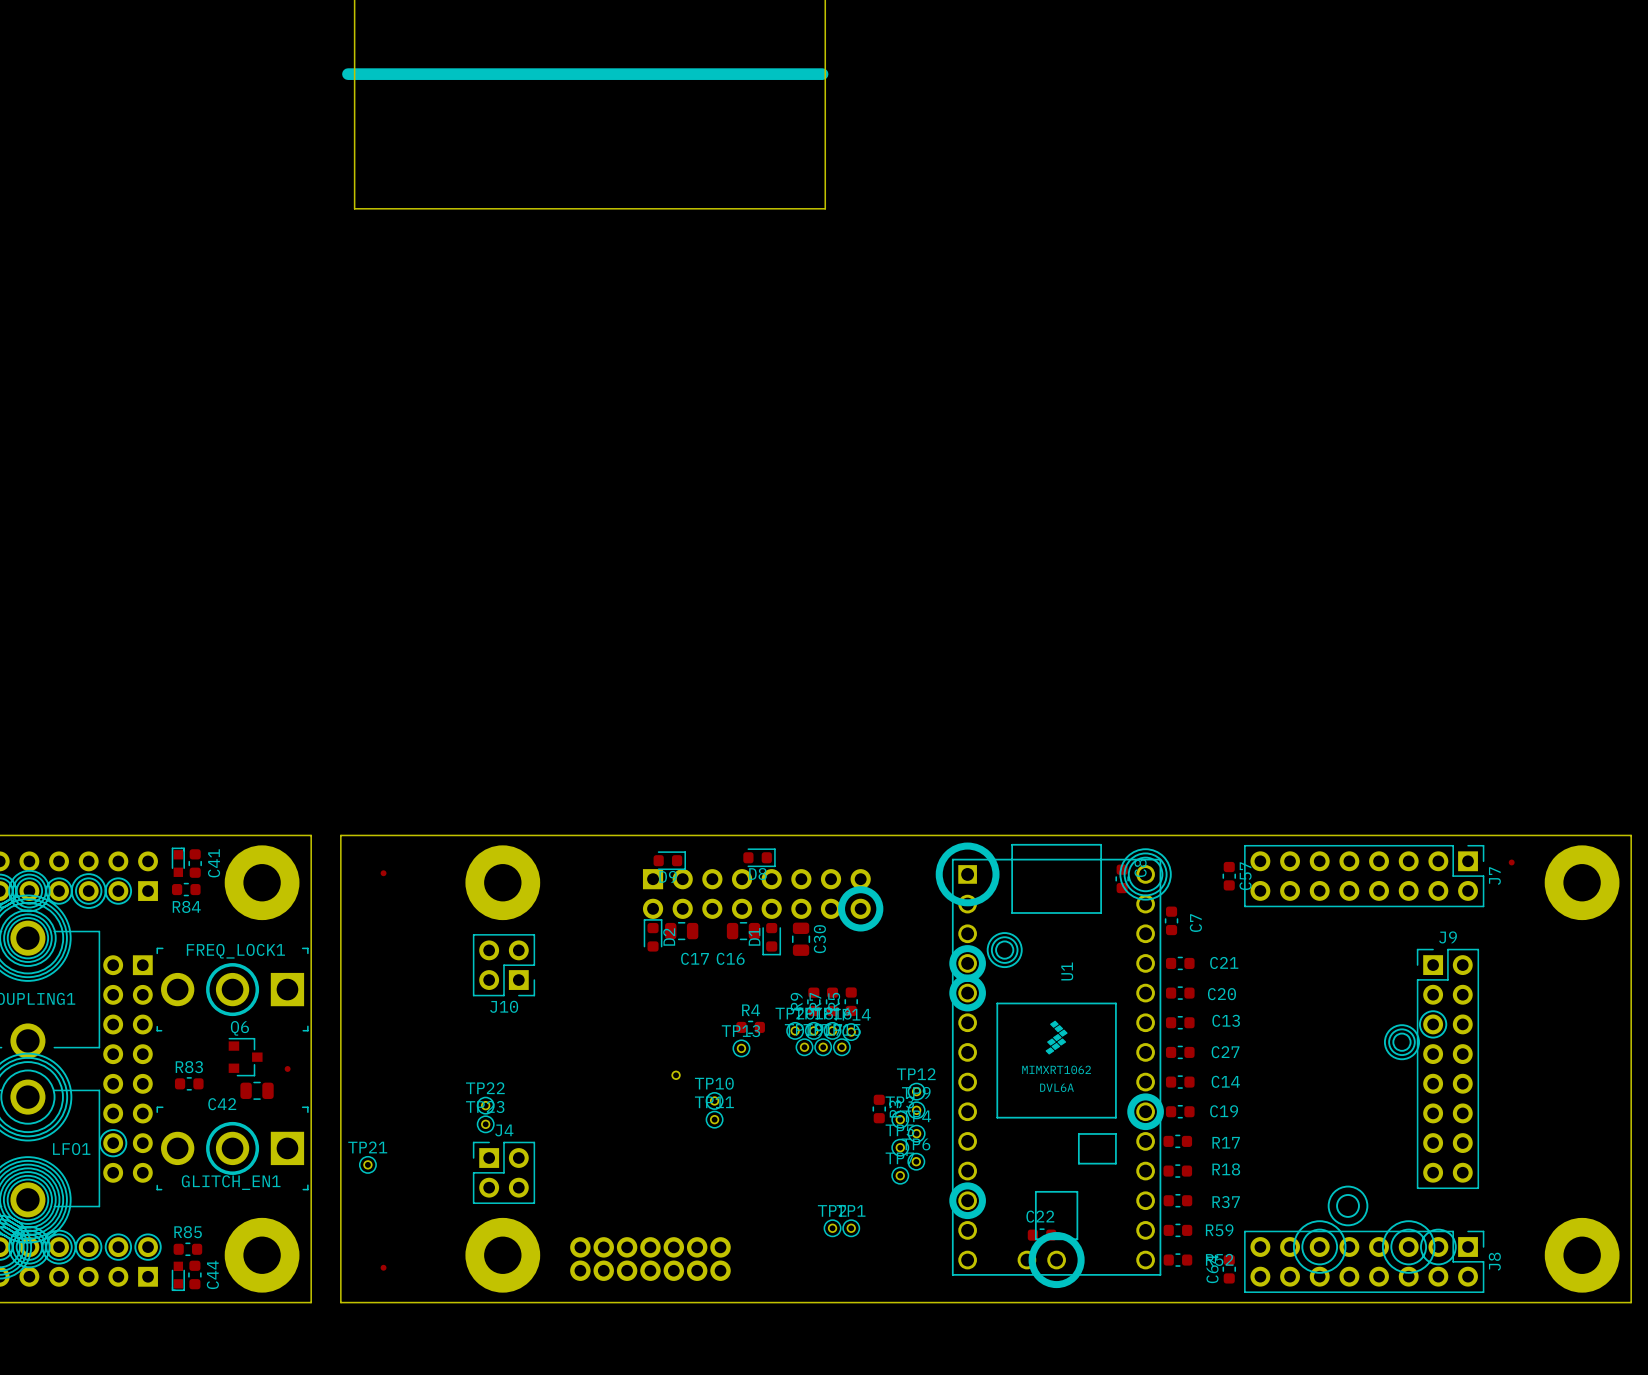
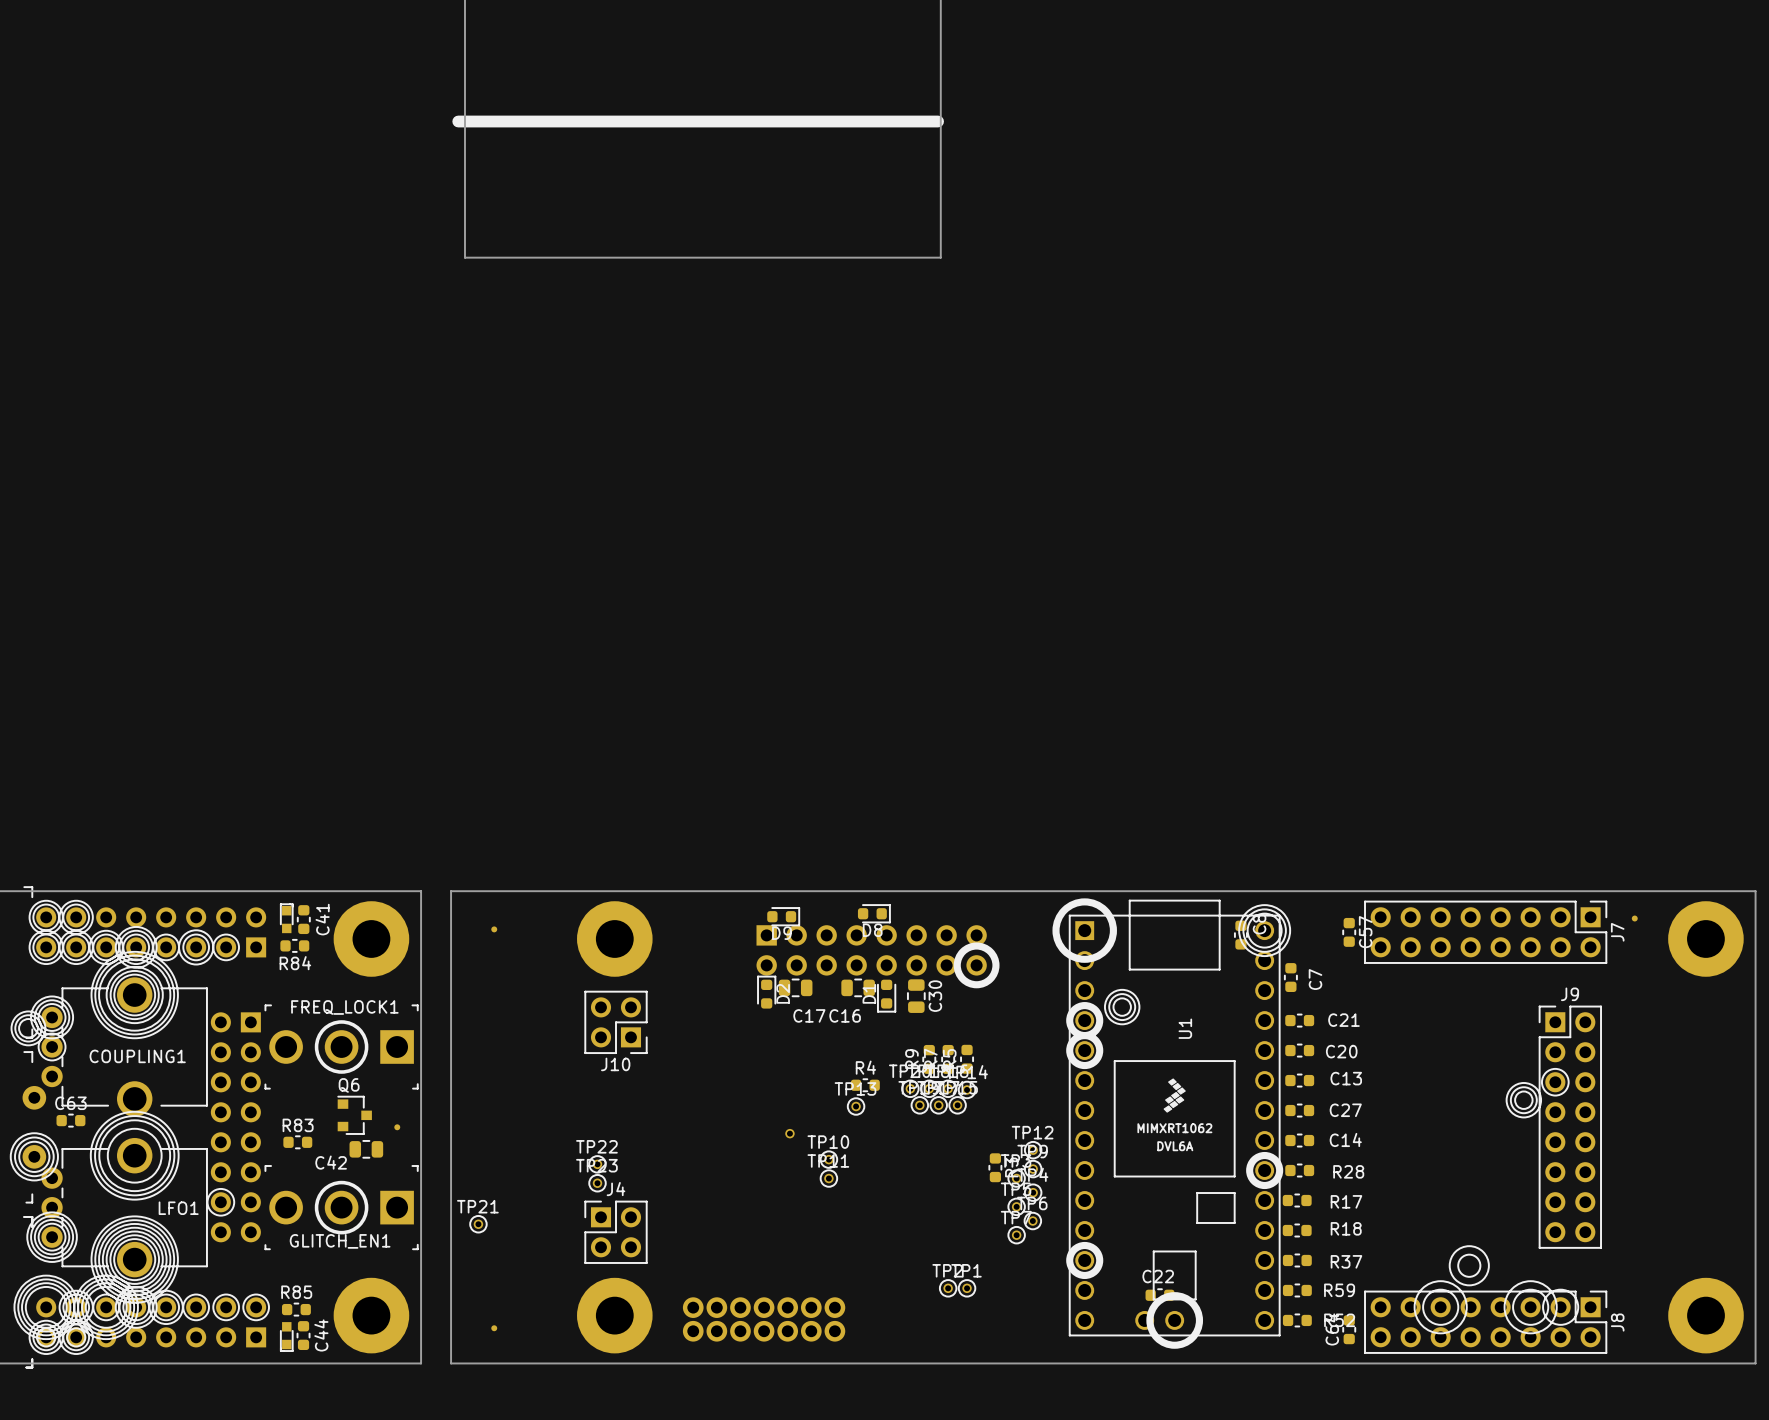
C19 name: C19 (1224, 1111) -> R28 (1348, 1171)

